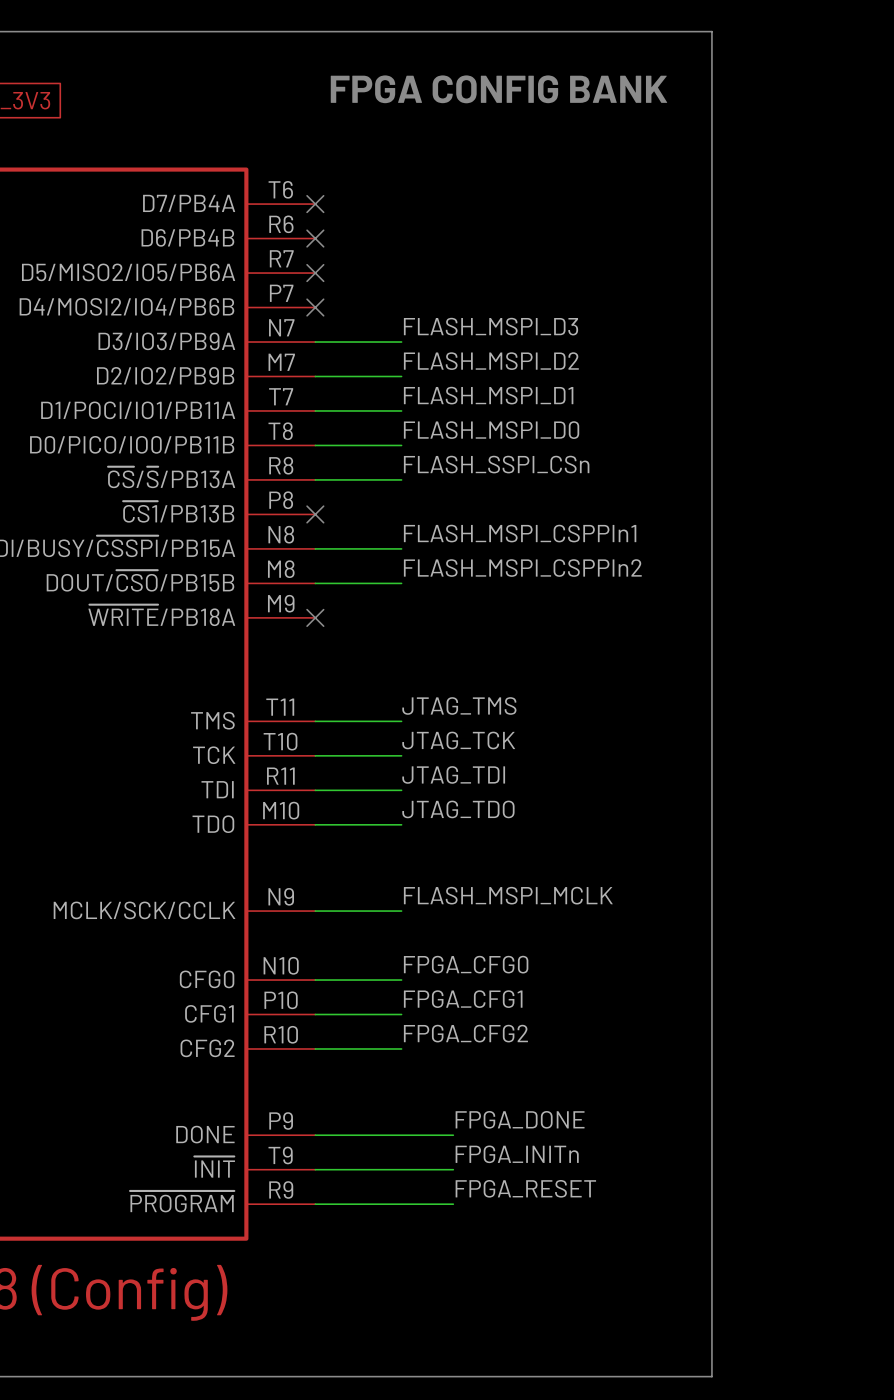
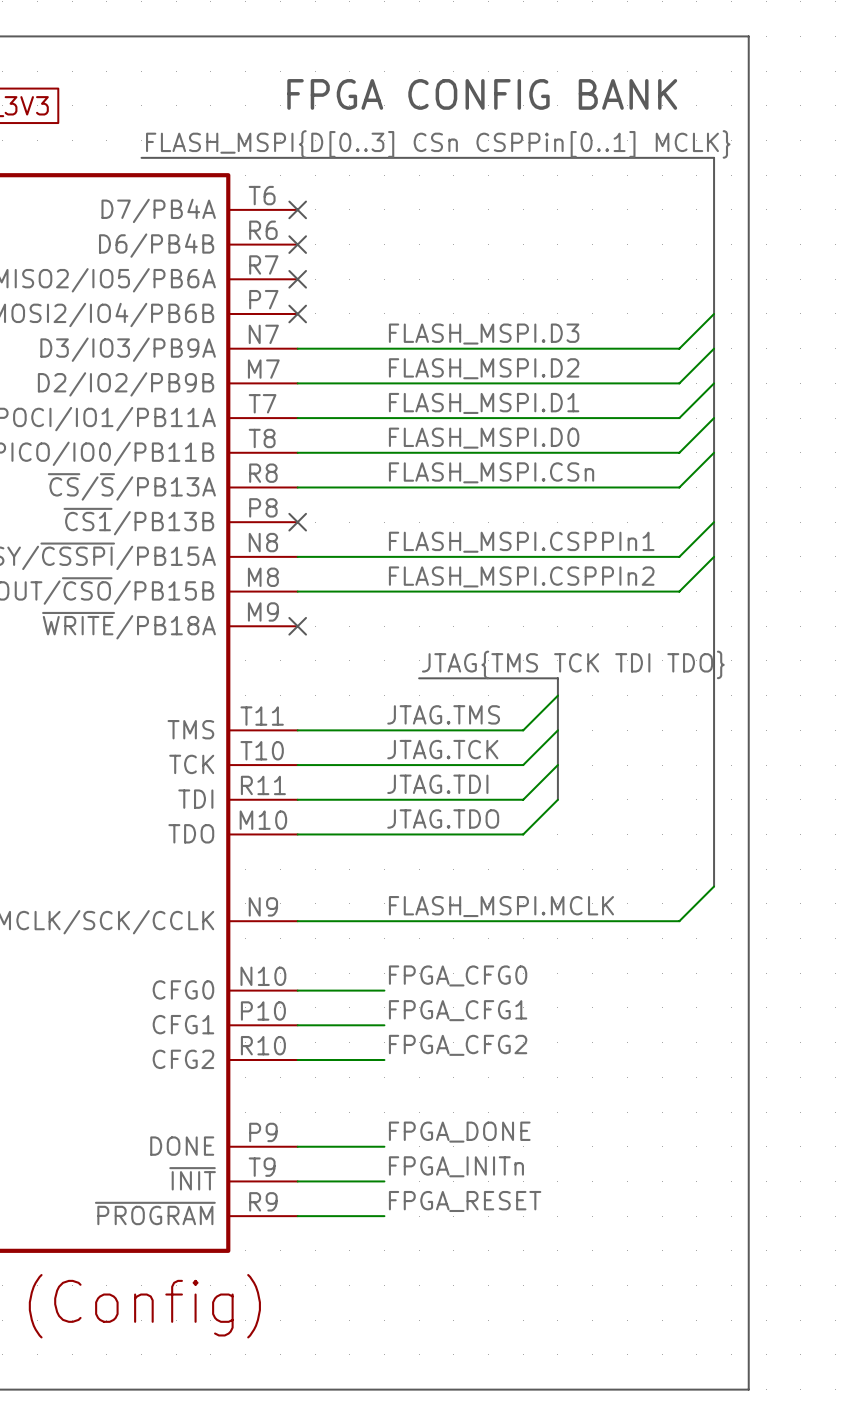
line: (711, 31) (711, 1376) -> (696, 36) (748, 36) (748, 1389) (696, 1389)
label: none -> FLASH_MSPI{D[0..3] CSn CSPPin[0..1] MCLK} (438, 144)
bus: none -> (141, 157) (714, 157) (714, 886)
wire: none -> (714, 313) (679, 348) (384, 348)
label: FLASH_MSPI_D3 (491, 326) -> FLASH_MSPI.D3 (484, 334)
wire: none -> (714, 348) (679, 383) (384, 383)
label: FLASH_MSPI_D2 (491, 361) -> FLASH_MSPI.D2 (484, 368)
wire: none -> (714, 383) (679, 418) (384, 418)
label: FLASH_MSPI_D1 (488, 395) -> FLASH_MSPI.D1 (484, 403)
wire: none -> (714, 418) (679, 452) (384, 452)
label: FLASH_MSPI_D0 (491, 430) -> FLASH_MSPI.D0 (484, 438)
wire: none -> (714, 452) (679, 487) (384, 487)
label: FLASH_SSPI_CSn (496, 464) -> FLASH_MSPI.CSn (491, 472)
wire: none -> (714, 522) (679, 556) (384, 556)
label: FLASH_MSPI_CSPPIn1 (520, 533) -> FLASH_MSPI.CSPPIn1 (521, 542)
wire: none -> (714, 556) (679, 591) (384, 591)
label: FLASH_MSPI_CSPPIn2 (522, 568) -> FLASH_MSPI.CSPPIn2 (521, 576)
label: none -> JTAG{TMS TCK TDI TDO} (573, 664)
bus: none -> (419, 678) (557, 678) (557, 799)
wire: none -> (557, 695) (523, 730) (384, 730)
label: JTAG_TMS (459, 705) -> JTAG.TMS (443, 714)
wire: none -> (557, 730) (523, 765) (384, 765)
label: JTAG_TCK (458, 740) -> JTAG.TCK (442, 749)
wire: none -> (557, 765) (523, 799) (384, 799)
label: JTAG_TDI (453, 774) -> JTAG.TDI (437, 784)
wire: none -> (557, 799) (523, 834) (384, 834)
label: JTAG_TDO (458, 809) -> JTAG.TDO (443, 818)
wire: none -> (714, 886) (679, 921) (384, 921)
label: FLASH_MSPI_MCLK (508, 895) -> FLASH_MSPI.MCLK (501, 906)
label position: FPGA_DONE (520, 1119) -> FPGA_DONE (459, 1132)
wire: (401, 1135) (453, 1135) -> none
label position: FPGA_INITn (517, 1154) -> FPGA_INITn (456, 1166)
wire: (401, 1169) (453, 1169) -> none
label position: FPGA_RESET (525, 1188) -> FPGA_RESET (465, 1201)
wire: (401, 1204) (453, 1204) -> none

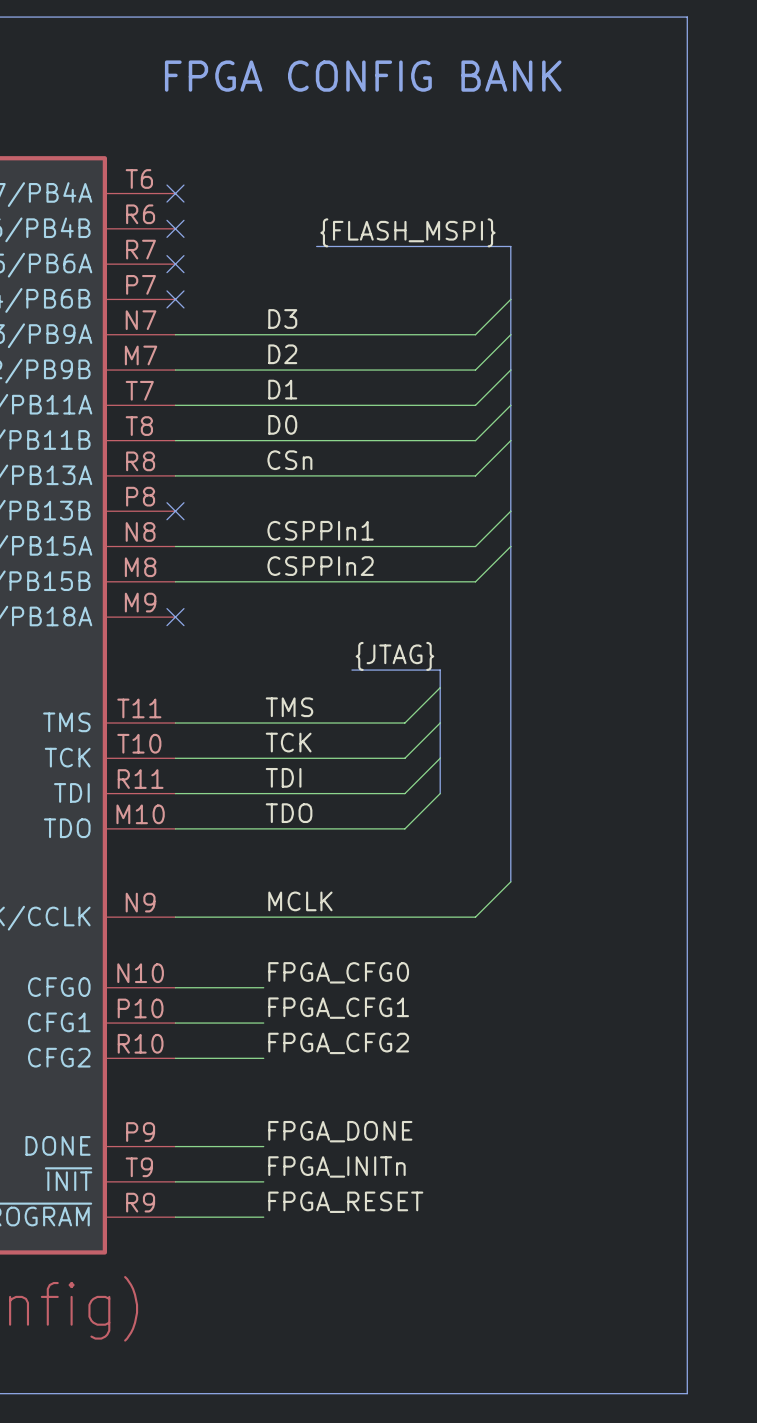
line: (748, 36) (748, 1389) -> (634, 17) (687, 17) (687, 1393) (634, 1393)
label: FLASH_MSPI{D[0..3] CSn CSPPin[0..1] MCLK} (438, 144) -> none
bus: (141, 157) (714, 157) (714, 886) -> none
label: none -> {FLASH_MSPI} (407, 232)
bus: none -> (316, 246) (510, 246) (510, 881)
wire: (714, 313) (679, 348) (592, 348) -> (510, 299) (475, 334)
label: FLASH_MSPI.D3 (484, 334) -> D3 (282, 318)
wire: (714, 348) (679, 383) (592, 383) -> (510, 334) (475, 370)
label: FLASH_MSPI.D2 (484, 368) -> D2 (282, 354)
wire: (714, 383) (679, 418) (592, 418) -> (510, 370) (475, 405)
label: FLASH_MSPI.D1 (484, 403) -> D1 (282, 389)
wire: (714, 418) (679, 452) (592, 452) -> (510, 405) (475, 440)
label: FLASH_MSPI.D0 (484, 438) -> D0 (282, 424)
wire: (714, 452) (679, 487) (592, 487) -> (510, 440) (475, 475)
label: FLASH_MSPI.CSn (491, 472) -> CSn (289, 460)
wire: (714, 522) (679, 556) (592, 556) -> (510, 511) (475, 546)
label: FLASH_MSPI.CSPPIn1 (521, 542) -> CSPPIn1 (320, 530)
wire: (714, 556) (679, 591) (592, 591) -> (510, 546) (475, 581)
label: FLASH_MSPI.CSPPIn2 (521, 576) -> CSPPIn2 (320, 566)
label: none -> {JTAG} (394, 656)
label: JTAG{TMS TCK TDI TDO} (573, 664) -> none
bus: (419, 678) (471, 678) -> none
label: JTAG.TMS (443, 714) -> TMS (289, 707)
label: JTAG.TCK (442, 749) -> TCK (288, 742)
label: JTAG.TDI (437, 784) -> TDI (283, 777)
label: JTAG.TDO (443, 818) -> TDO (289, 813)
wire: (714, 886) (679, 921) (592, 921) -> (510, 881) (475, 917)
label: FLASH_MSPI.MCLK (501, 906) -> MCLK (300, 901)

